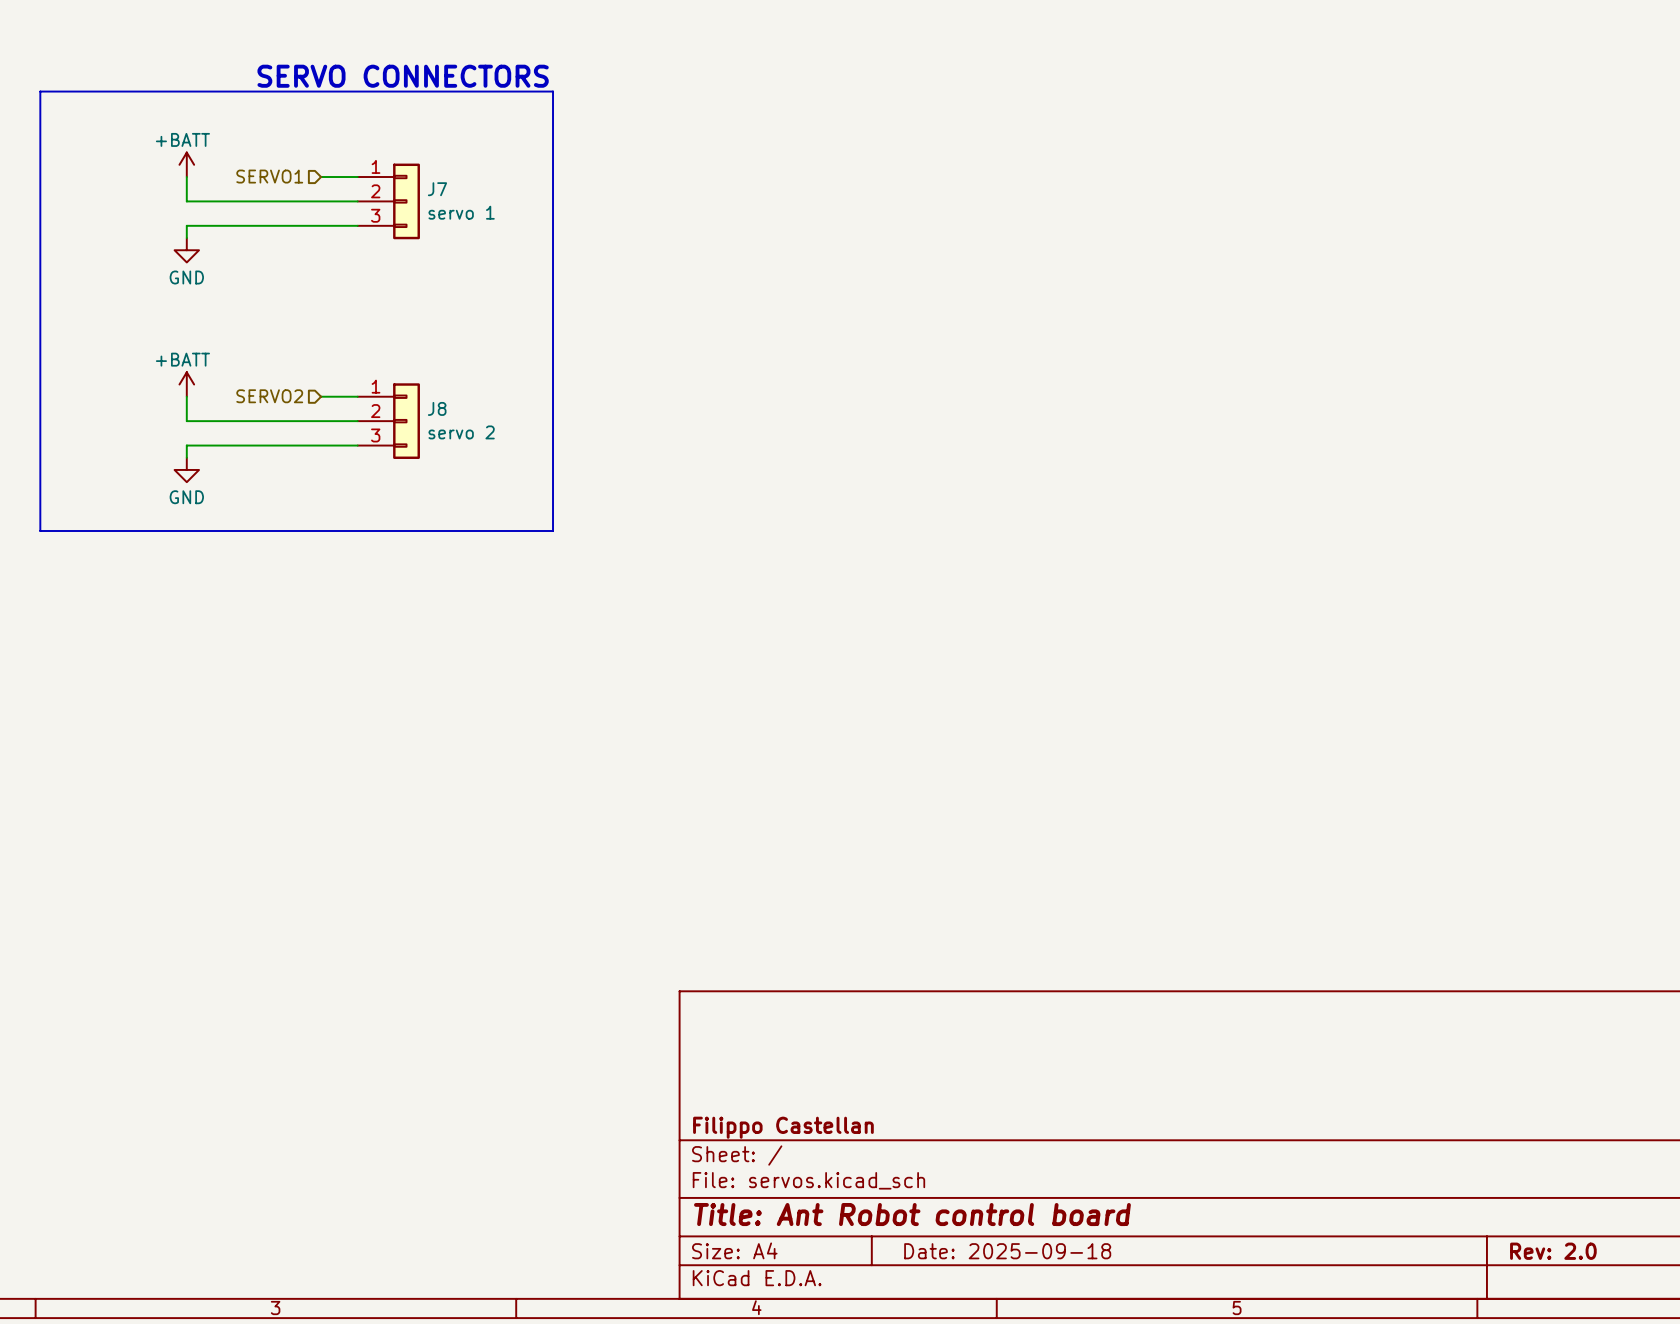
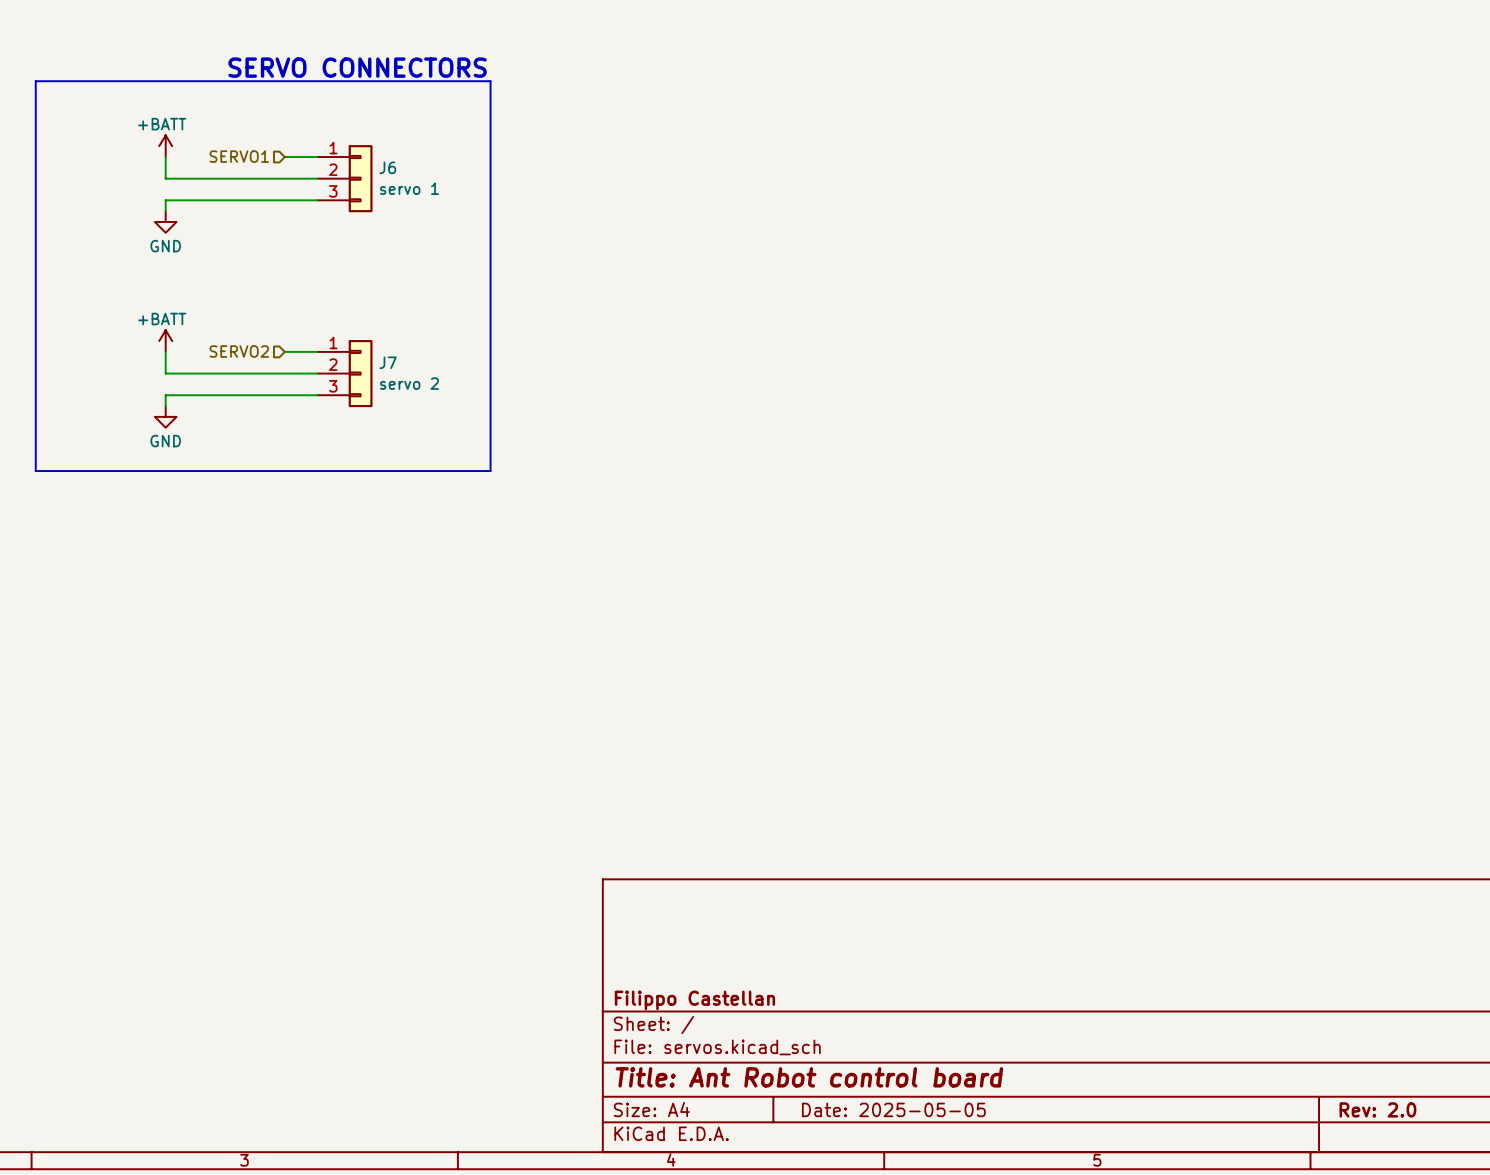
J7 name: J7 (437, 189) -> J6 (387, 167)
J8 name: J8 (437, 408) -> J7 (388, 362)
title block: Date: 2025-09-18 (1007, 1251) -> Date: 2025-05-05 (893, 1109)

